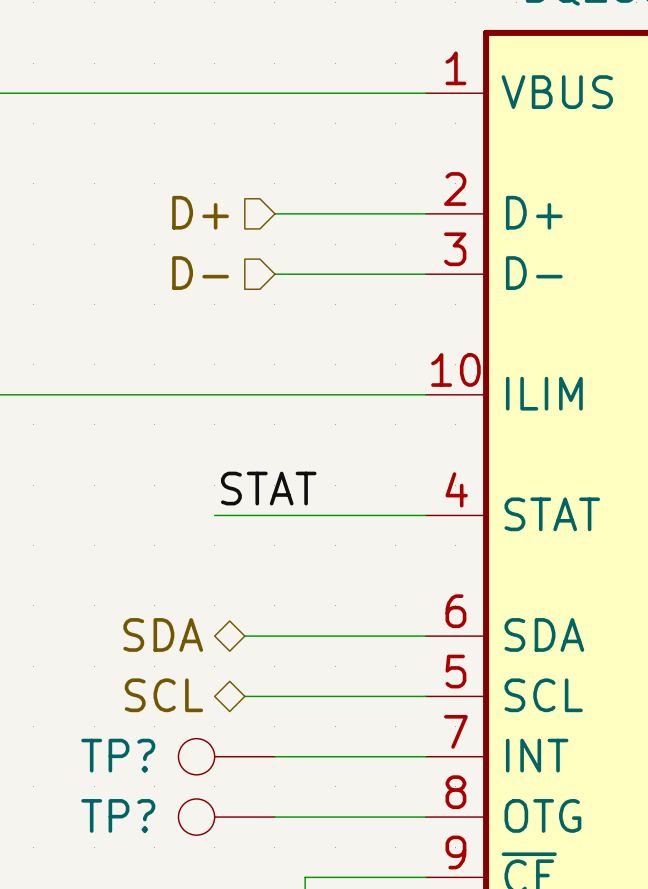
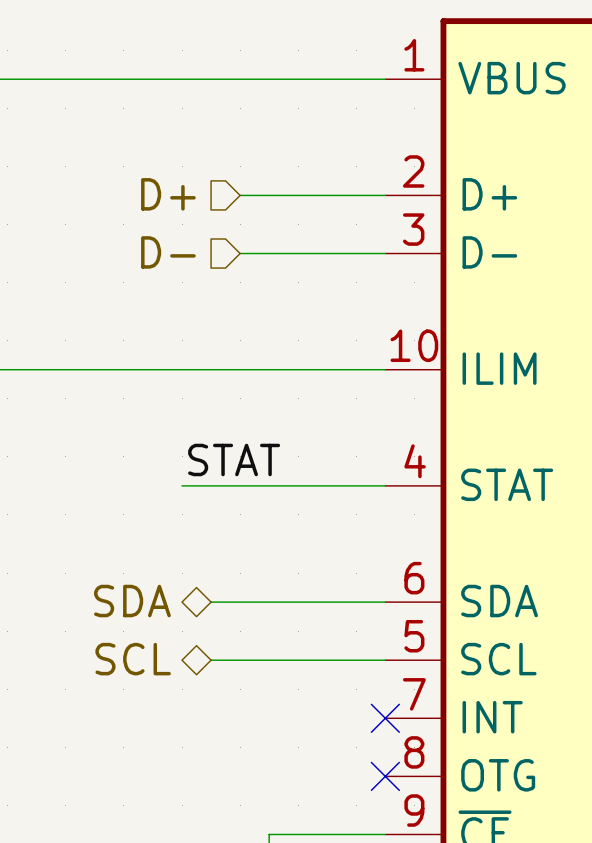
TP?: (226, 756) -> none
wire: (274, 756) (425, 756) -> none
no-connect mark: none -> (385, 718)
TP?: (226, 817) -> none
wire: (274, 817) (425, 817) -> none
no-connect mark: none -> (385, 776)

